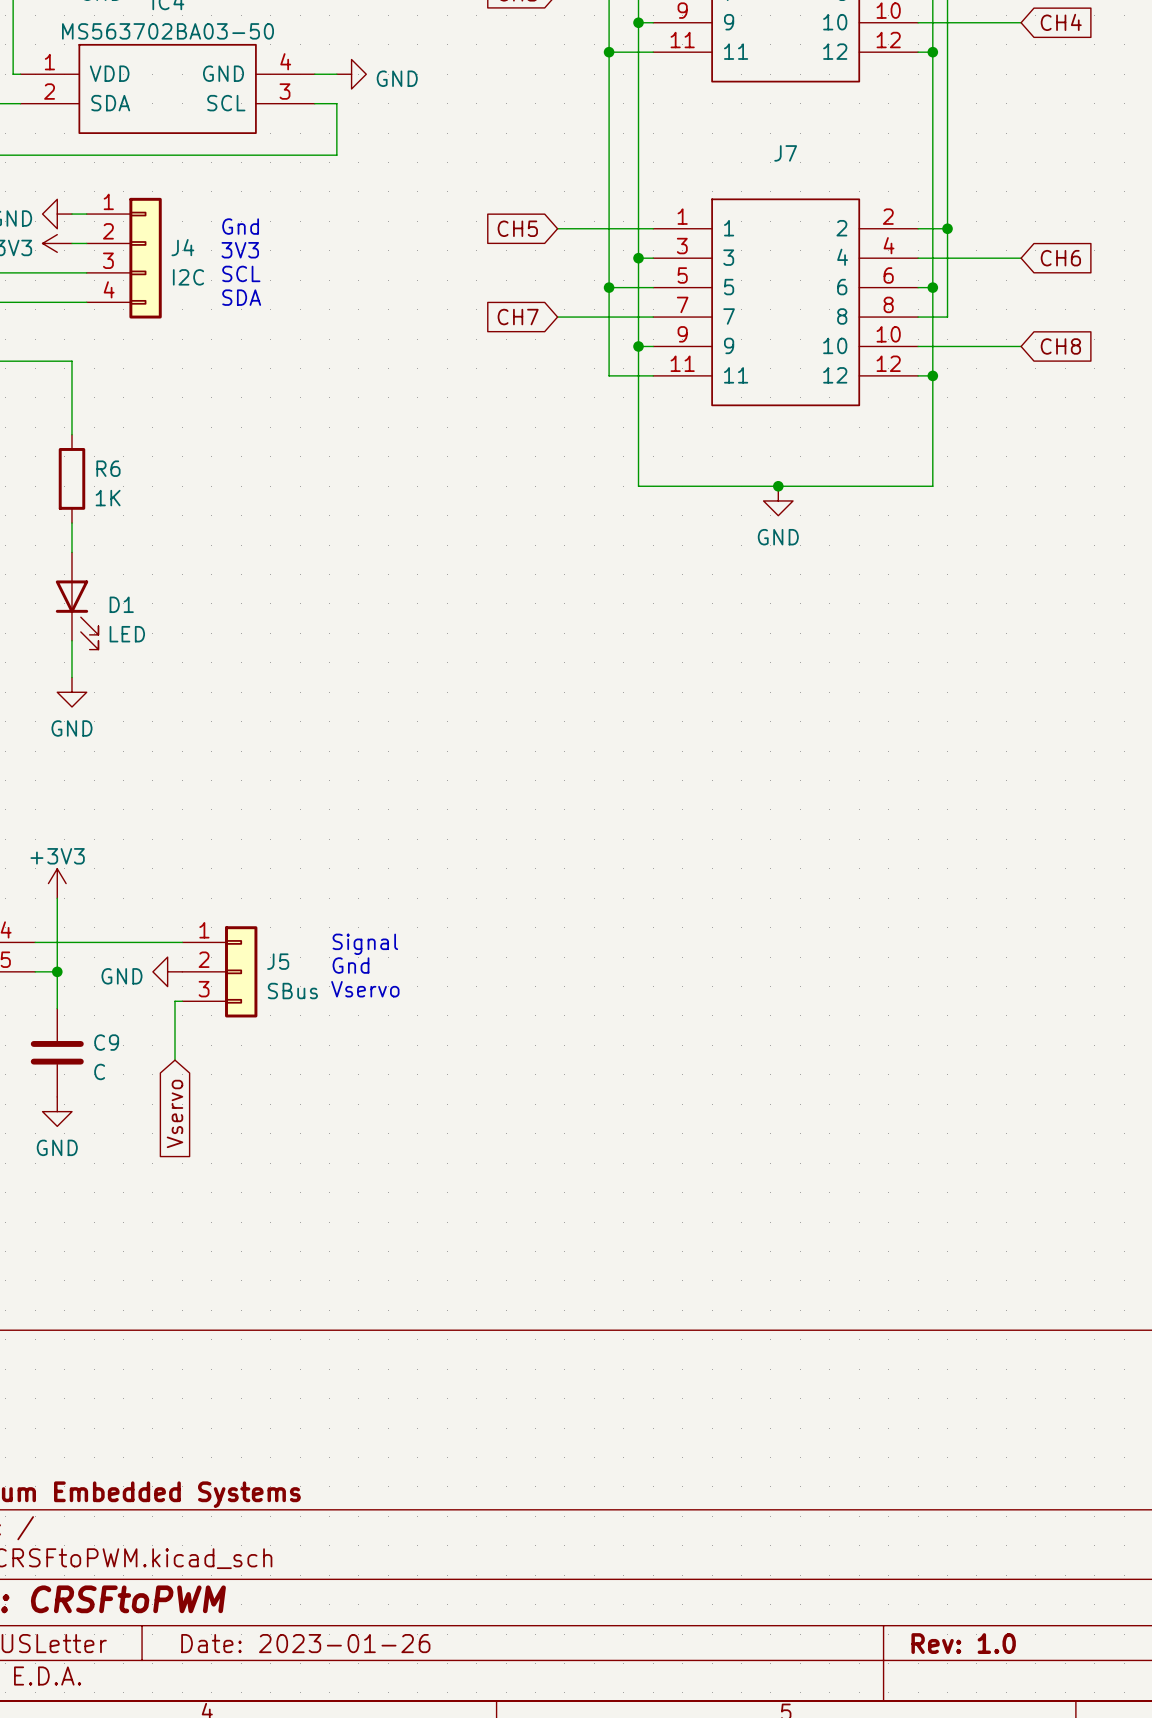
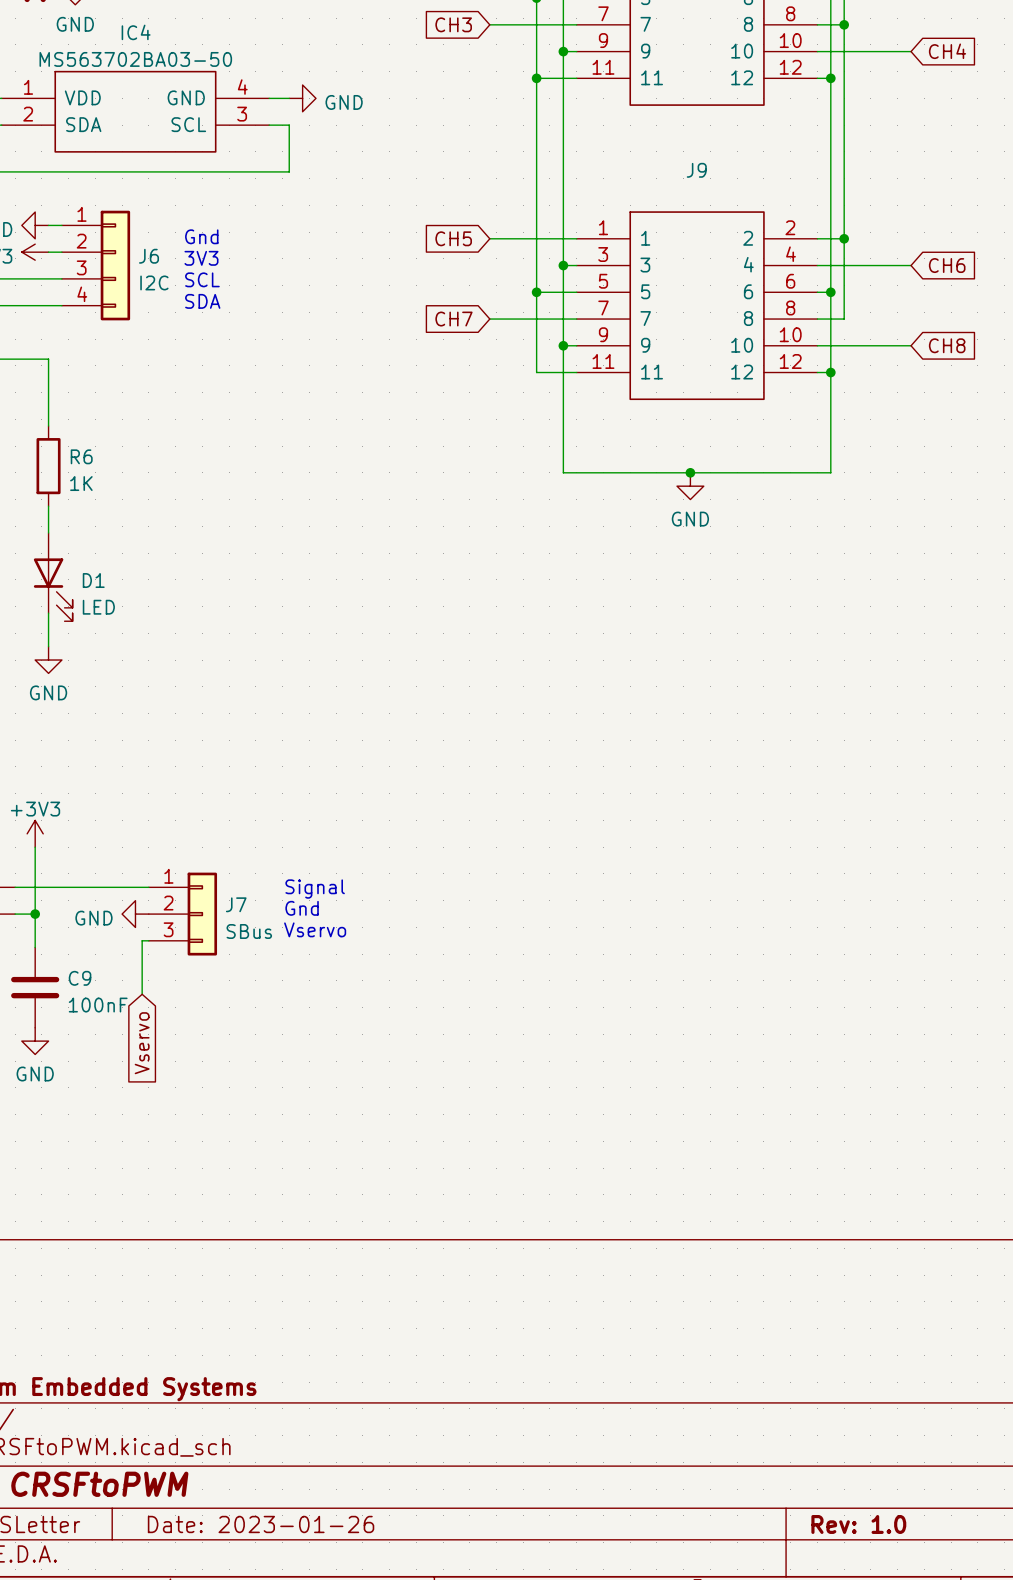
J7 name: J7 (785, 153) -> J9 (696, 170)
J4 name: J4 (182, 247) -> J6 (149, 256)
J5 name: J5 (278, 961) -> J7 (236, 904)
C9 value: C (99, 1071) -> 100nF (98, 1005)

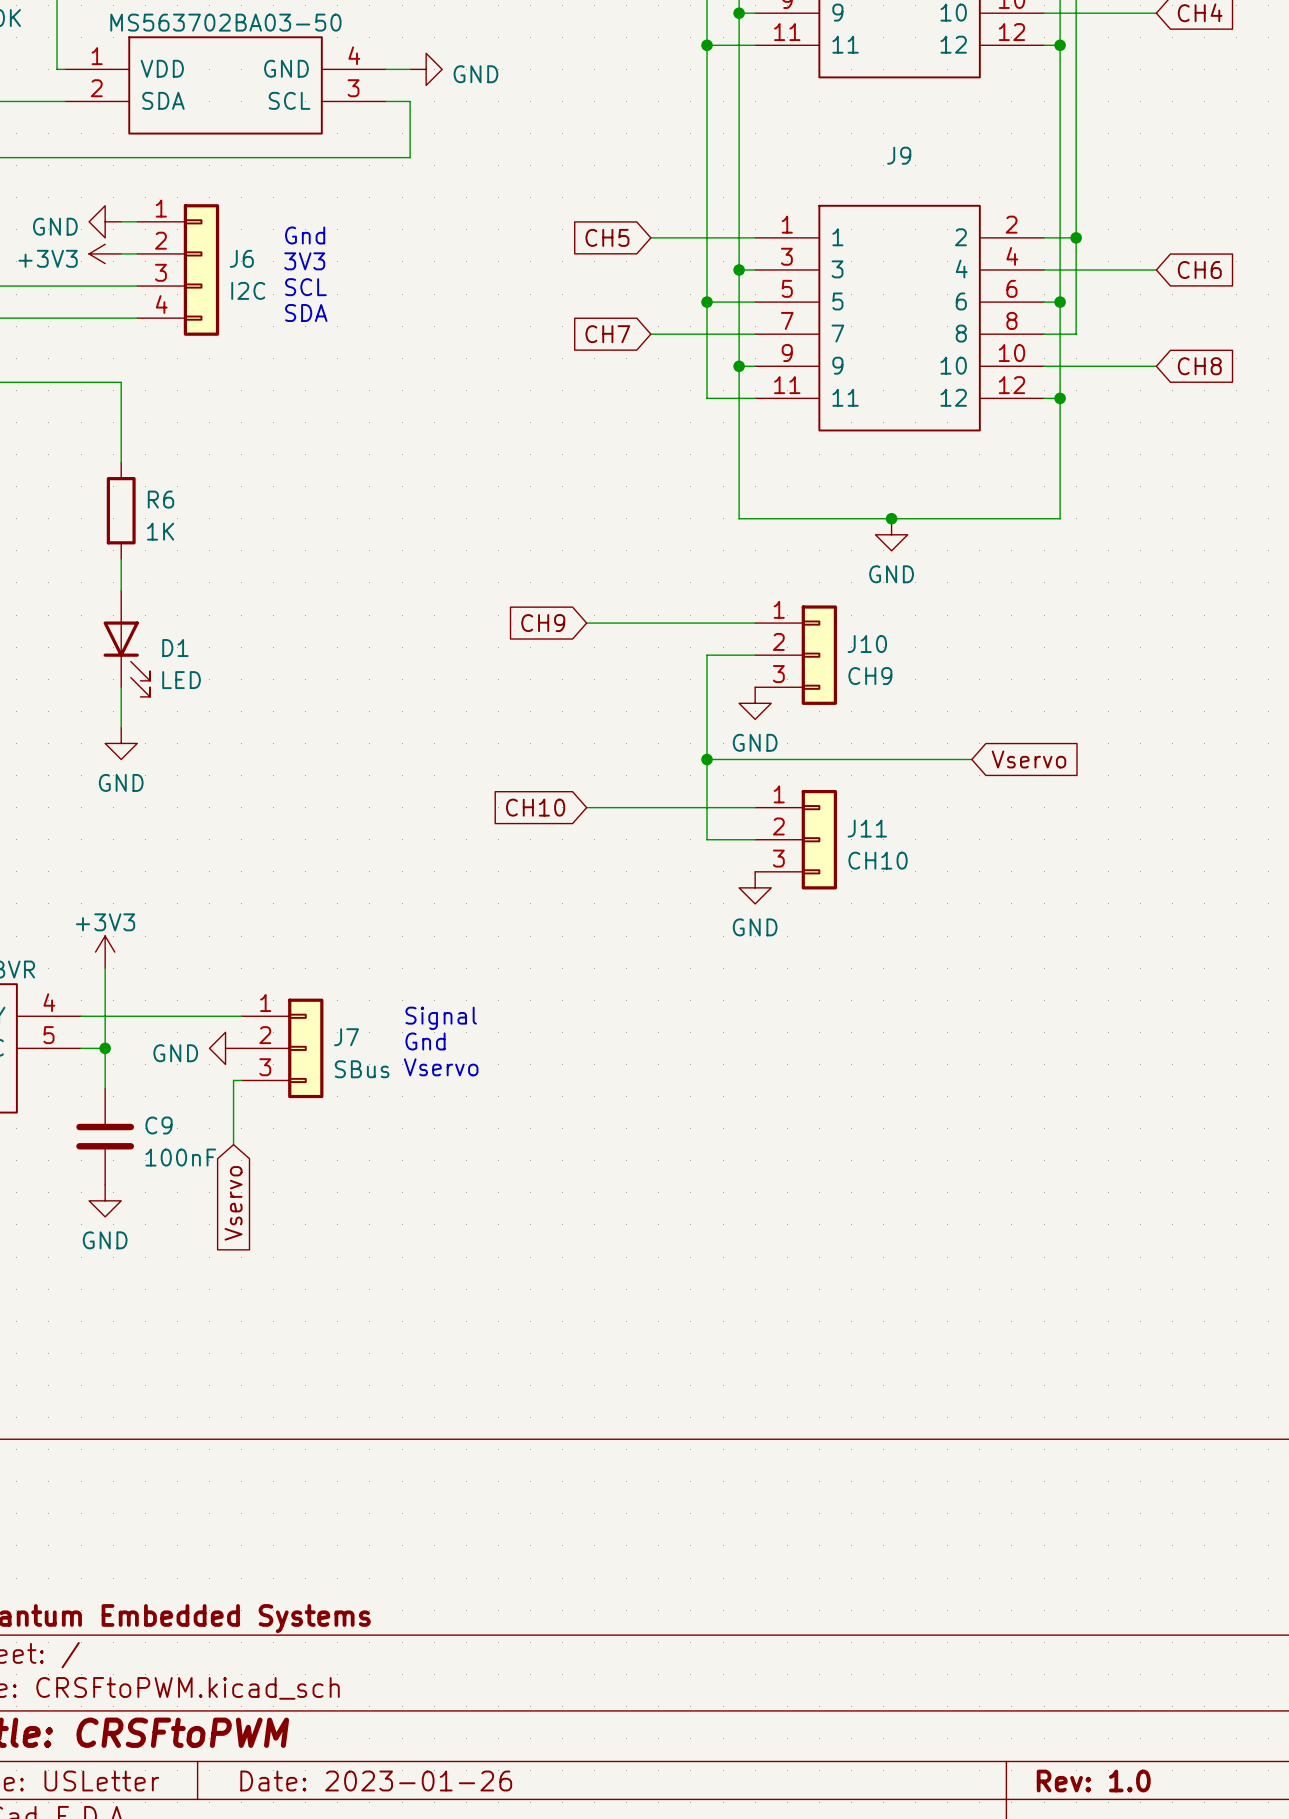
global label: none -> CH9 (543, 623)
wire: none -> (586, 623) (755, 623)
wire: none -> (755, 655) (707, 655) (707, 839) (755, 839)
J10: none -> CH9 (796, 655)
power symbol: none -> GND (755, 703)
wire: none -> (707, 759) (971, 759)
junction: none -> (707, 759)
global label: none -> Vservo (1028, 759)
global label: none -> CH10 (535, 807)
wire: none -> (586, 807) (755, 807)
J11: none -> CH10 (796, 839)
power symbol: none -> GND (755, 887)

